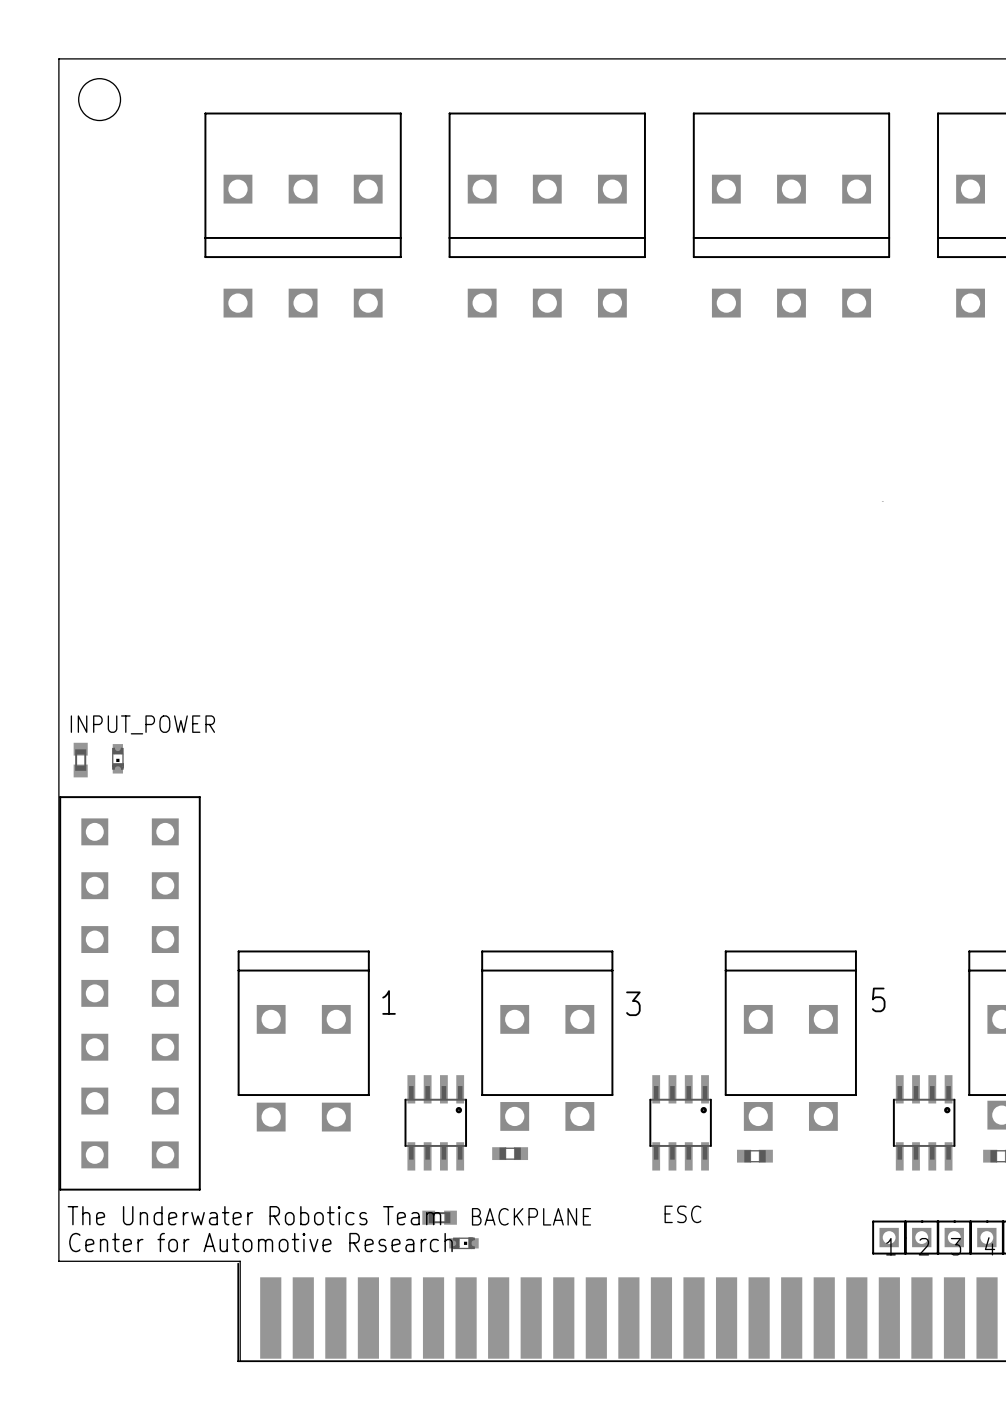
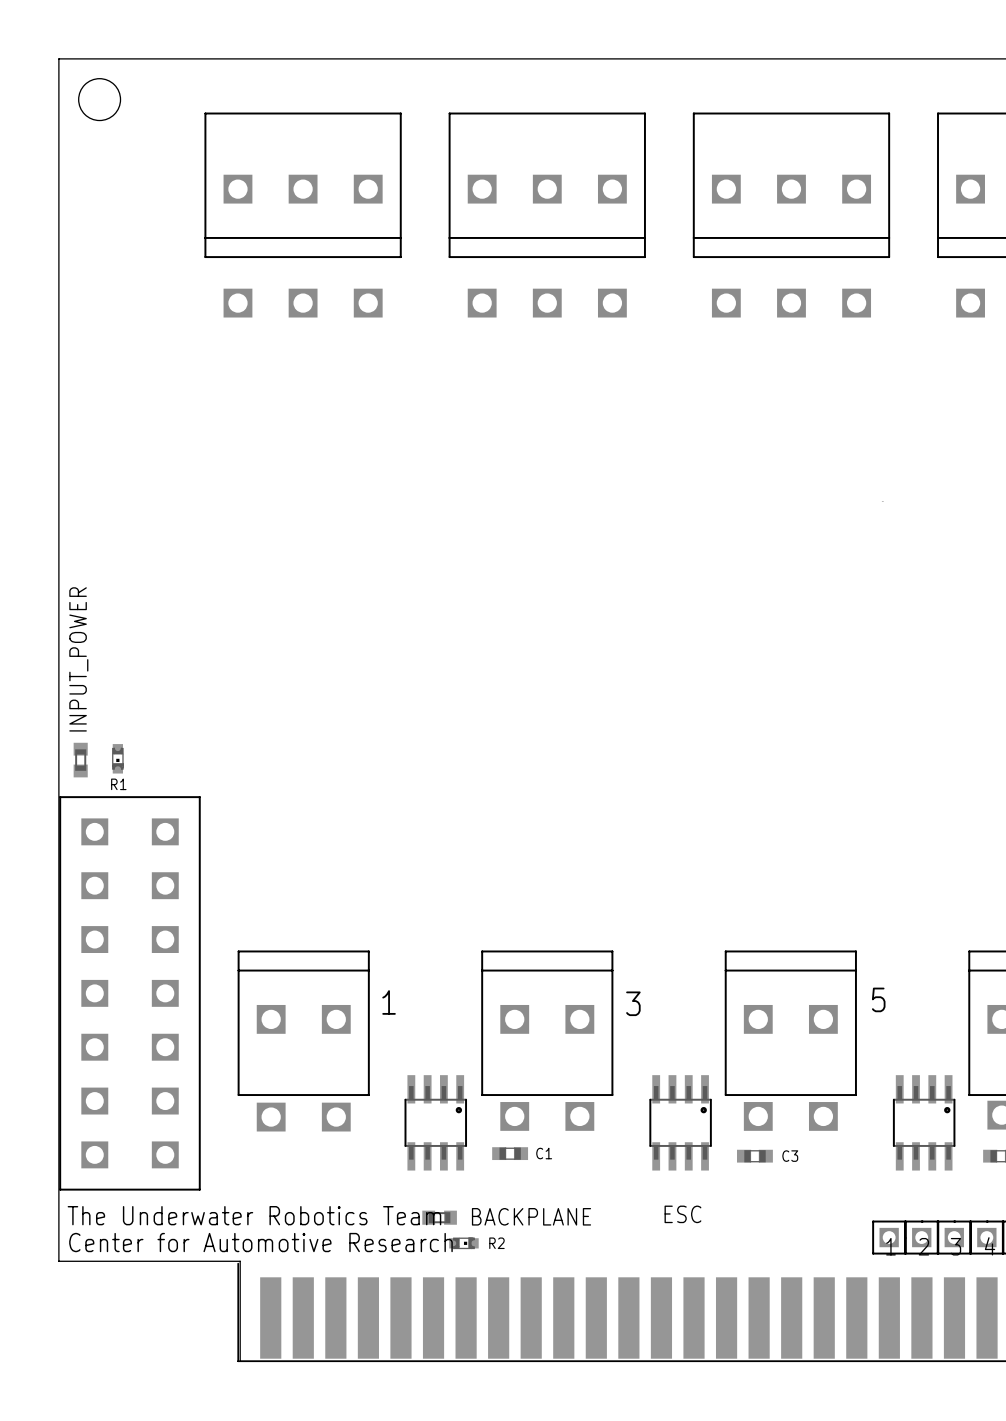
INPUT_POWER name rotation: 0° (142, 724) -> 90° counterclockwise (78, 659)
text: none -> R1 (118, 784)
text: none -> C1 (544, 1153)
text: none -> C3 (790, 1156)
text: none -> R2 (496, 1243)

